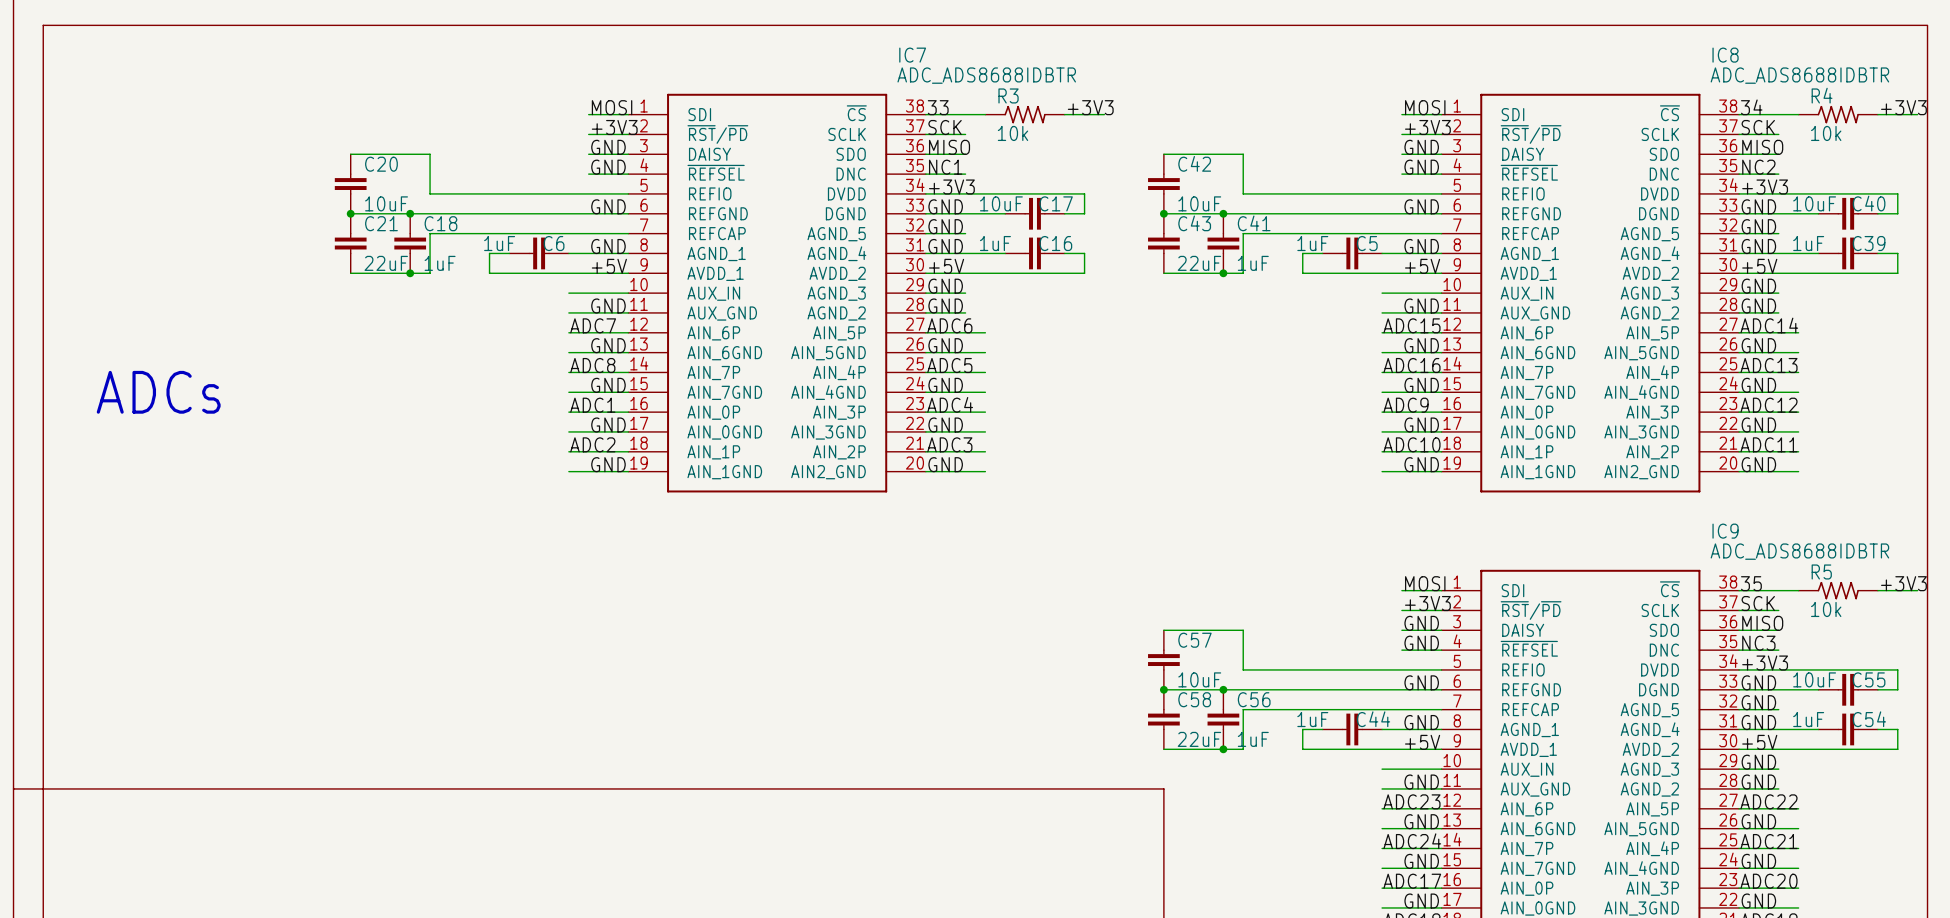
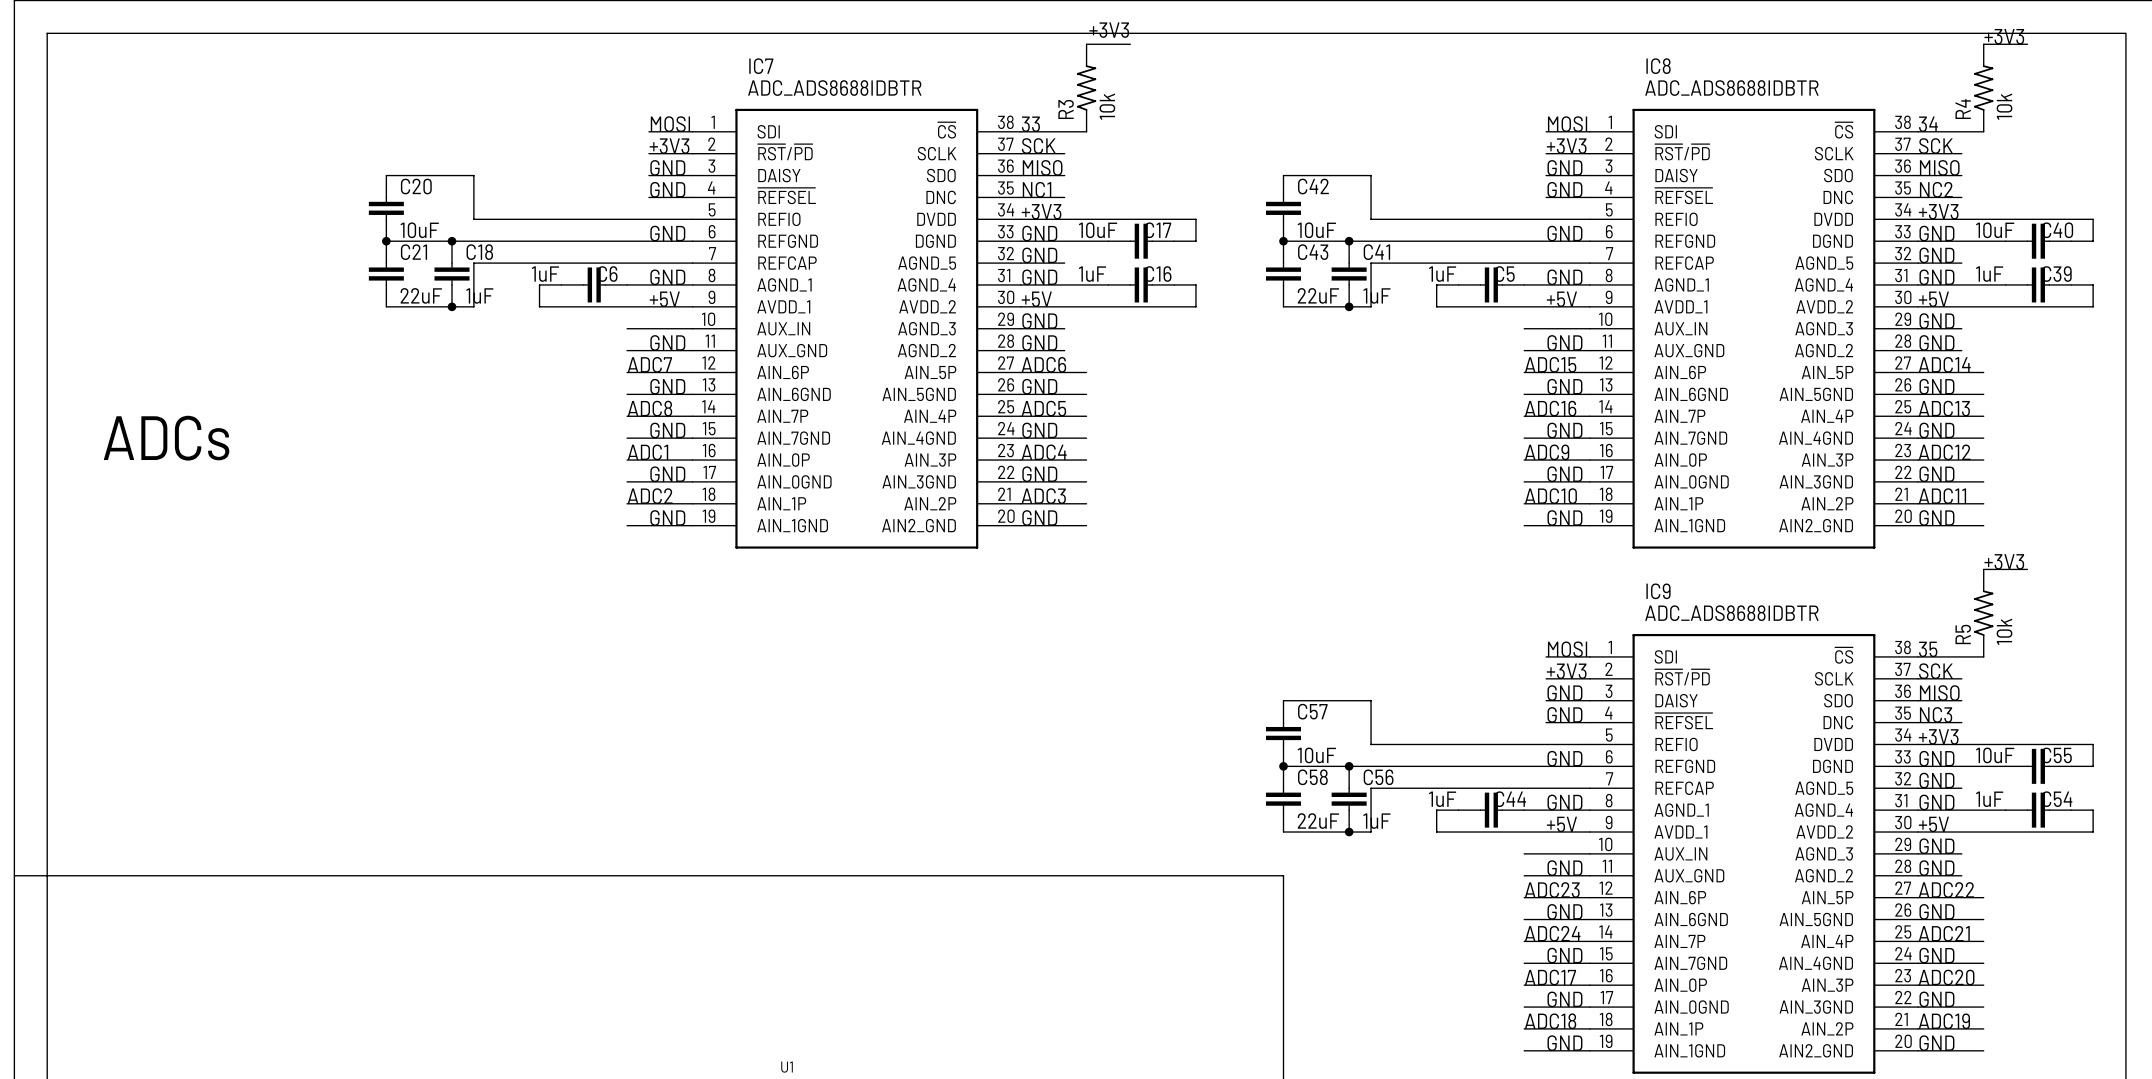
IC7 name position: IC7 (912, 55) -> IC7 (761, 66)
IC8 name position: IC8 (1725, 55) -> IC8 (1658, 66)
IC7 value position: ADC_ADS8688IDBTR (986, 75) -> ADC_ADS8688IDBTR (834, 88)
IC8 value position: ADC_ADS8688IDBTR (1799, 75) -> ADC_ADS8688IDBTR (1731, 88)
label position: +3V3 (1090, 107) -> +3V3 (1109, 30)
label position: +3V3 (1903, 107) -> +3V3 (2004, 36)
R3 rotation: 0° (1025, 114) -> 90° counterclockwise (1086, 88)
R3 position: (1025, 114) -> (1086, 88)
wire: (1064, 114) (1104, 114) -> (1086, 44) (1130, 44)
R4 rotation: 0° (1838, 114) -> 90° counterclockwise (1983, 88)
R4 position: (1838, 114) -> (1983, 88)
wire: (1877, 114) (1917, 114) -> (1983, 44) (2027, 44)
IC9 name position: IC9 (1725, 531) -> IC9 (1658, 591)
IC9 value position: ADC_ADS8688IDBTR (1799, 551) -> ADC_ADS8688IDBTR (1731, 613)
label position: +3V3 (1903, 583) -> +3V3 (2004, 561)
R5 rotation: 0° (1838, 590) -> 90° counterclockwise (1983, 613)
R5 position: (1838, 590) -> (1983, 613)
wire: (1877, 590) (1917, 590) -> (1983, 569) (2027, 569)

